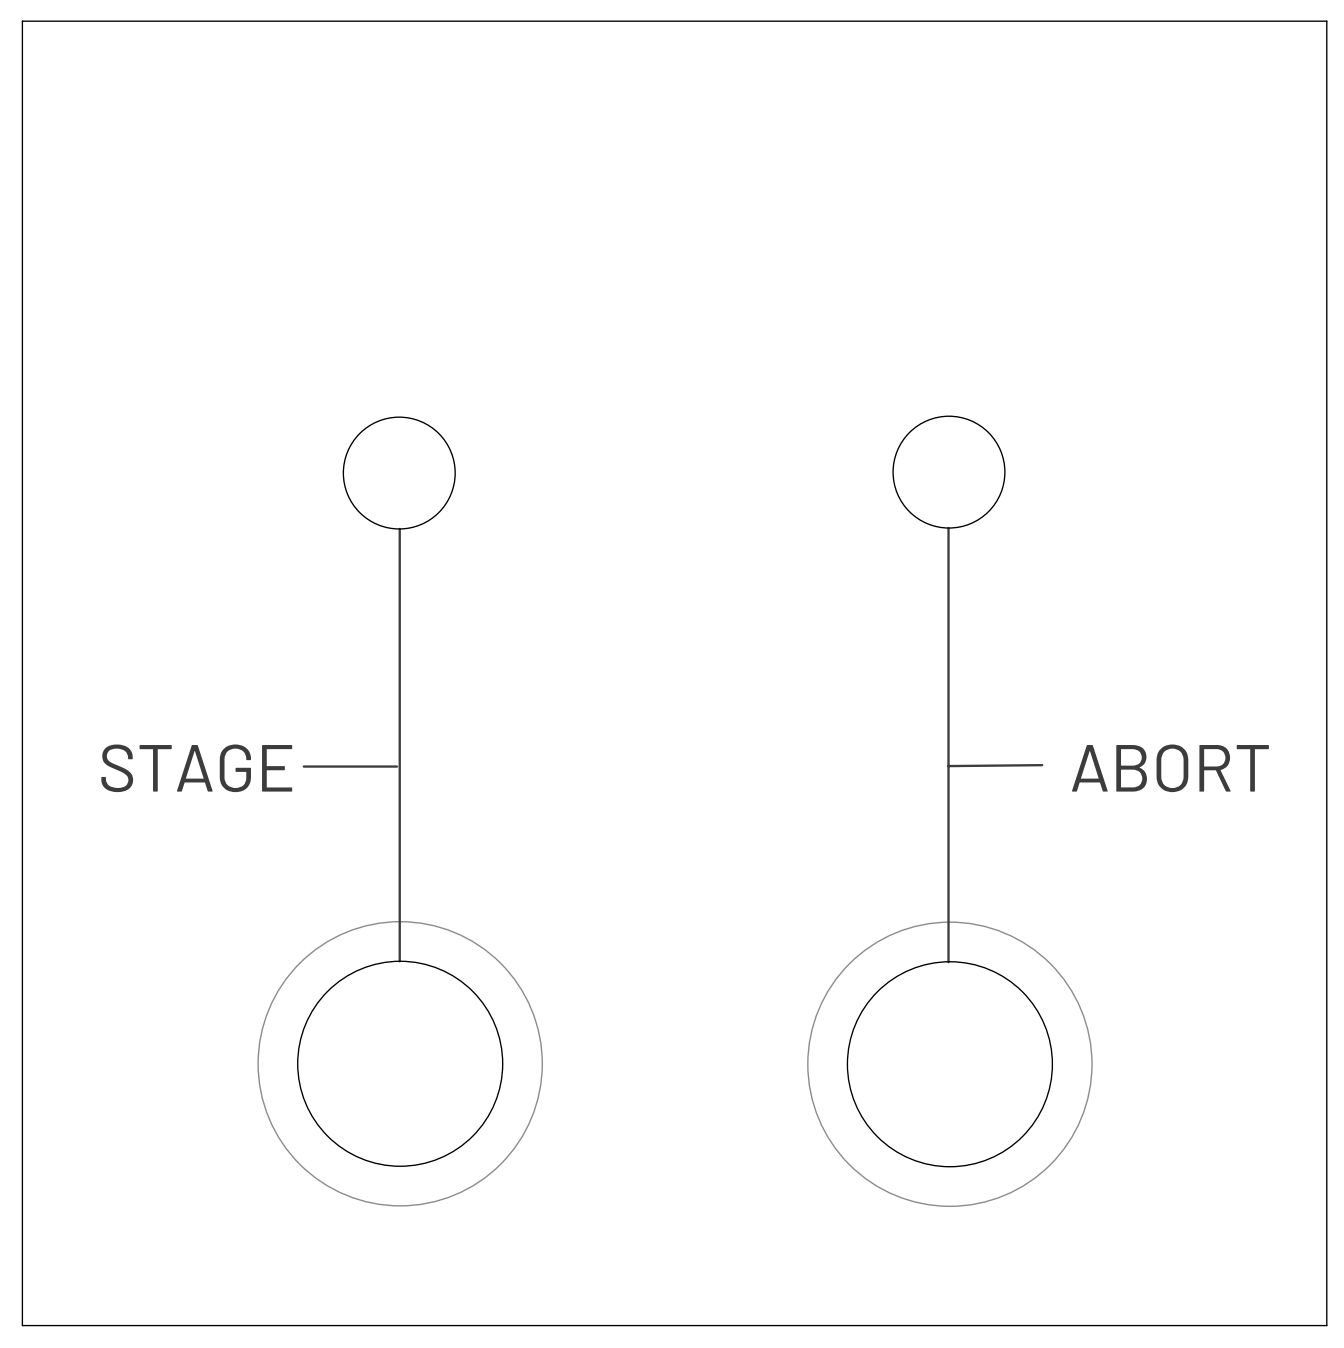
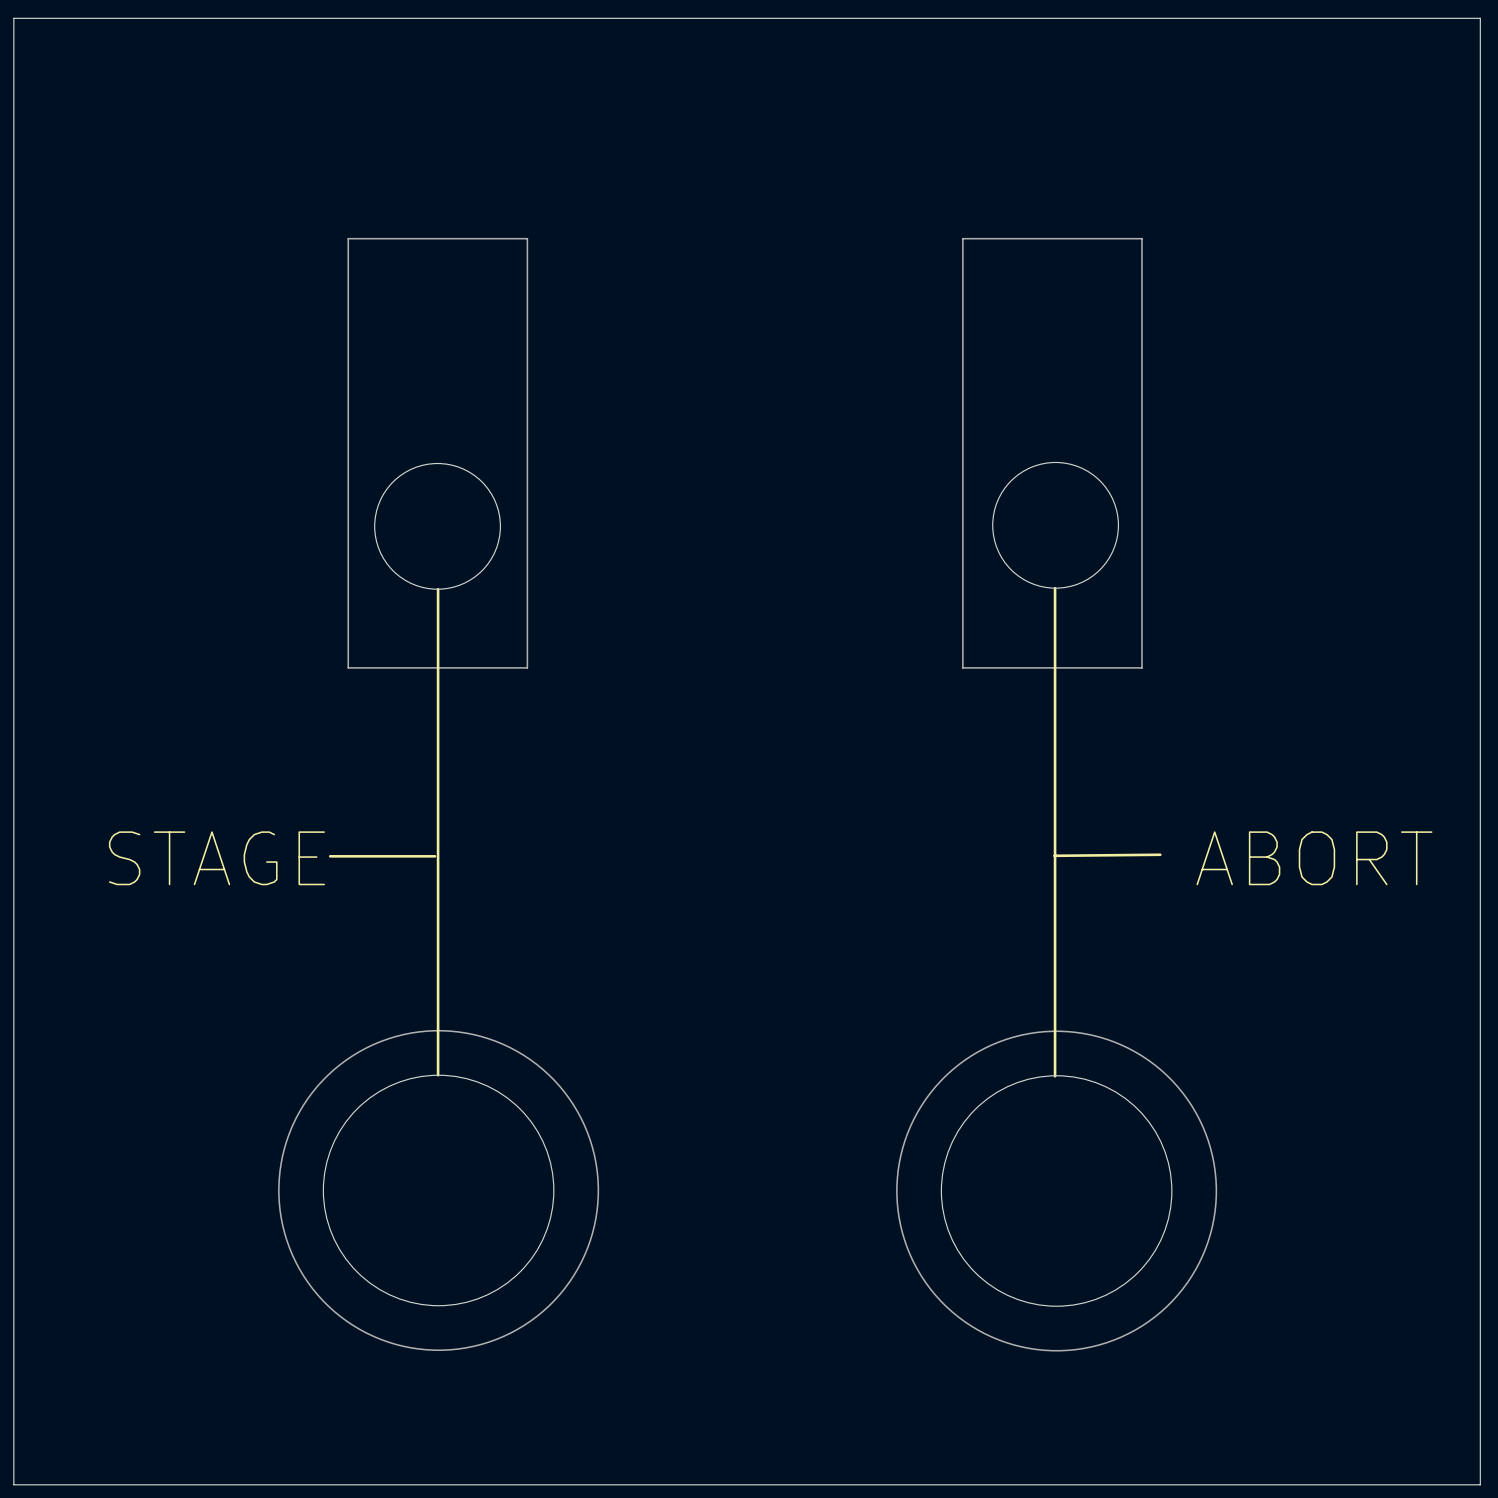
line: none -> (348, 238) (527, 238) (527, 667) (348, 667) (348, 238)
line: none -> (962, 238) (1141, 238) (1141, 667) (962, 667) (962, 238)

